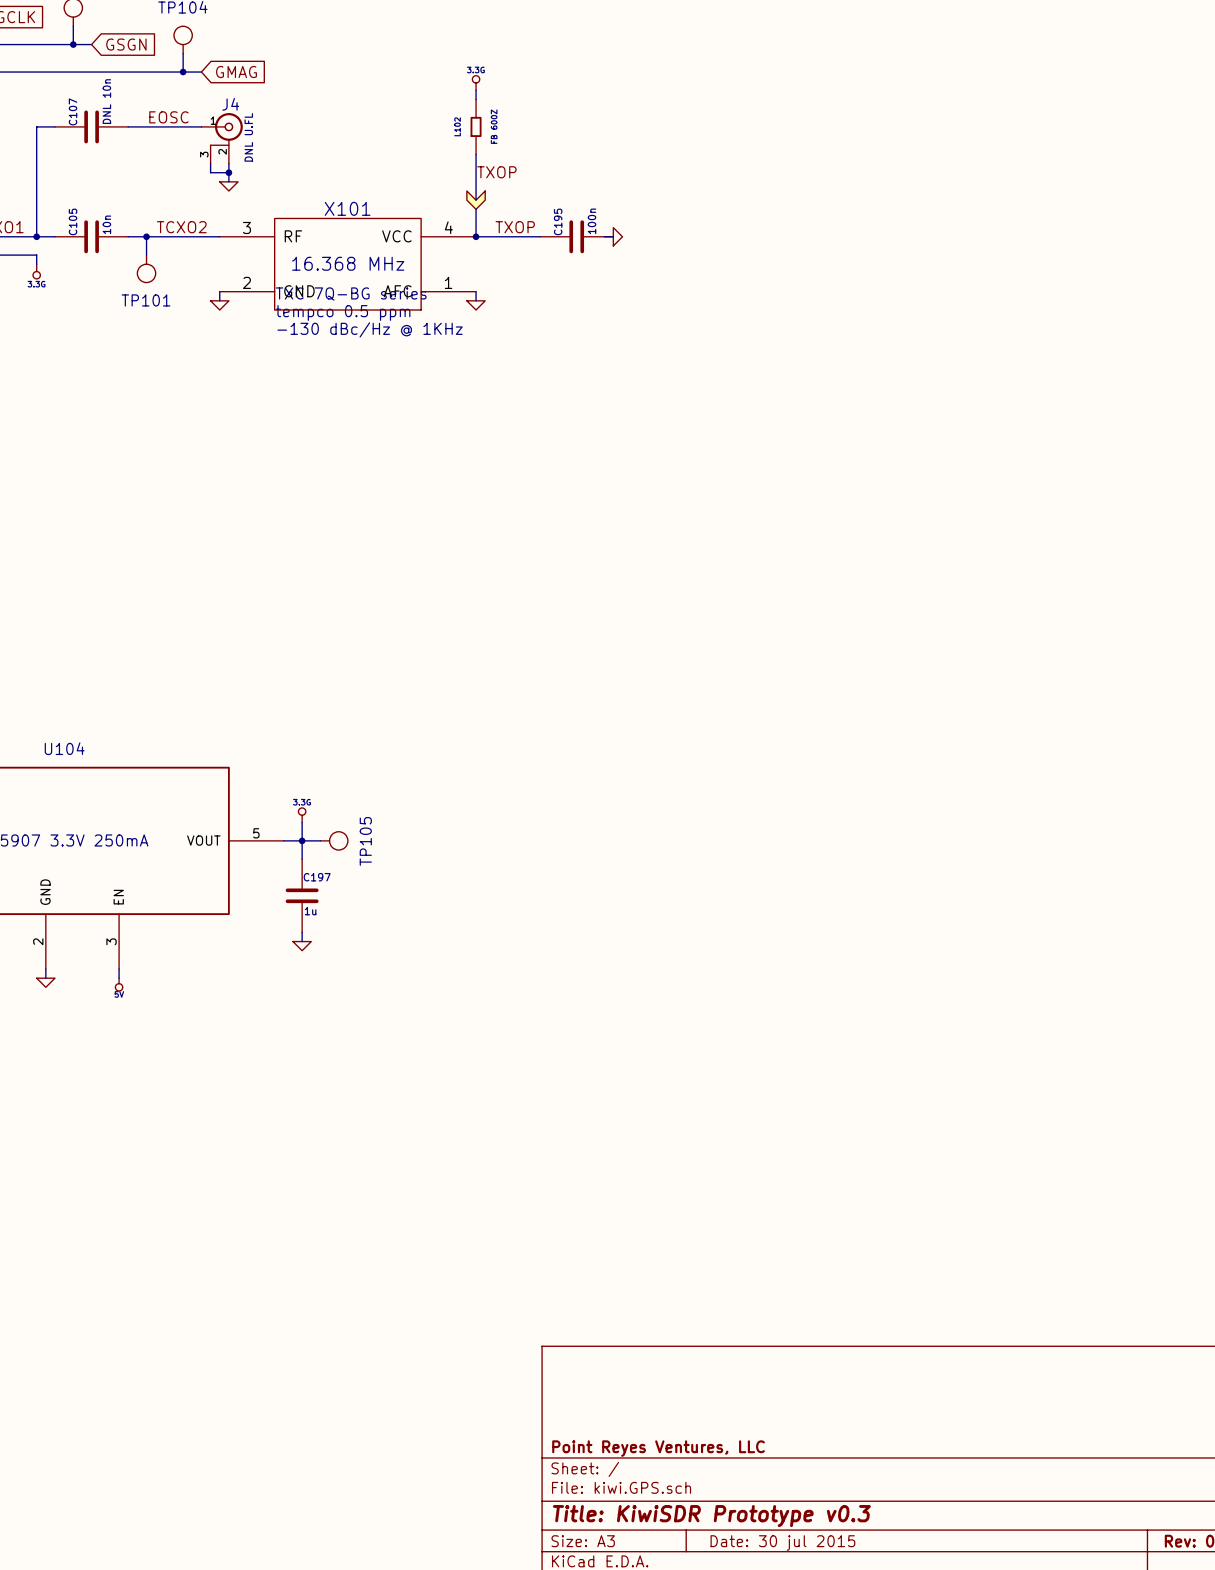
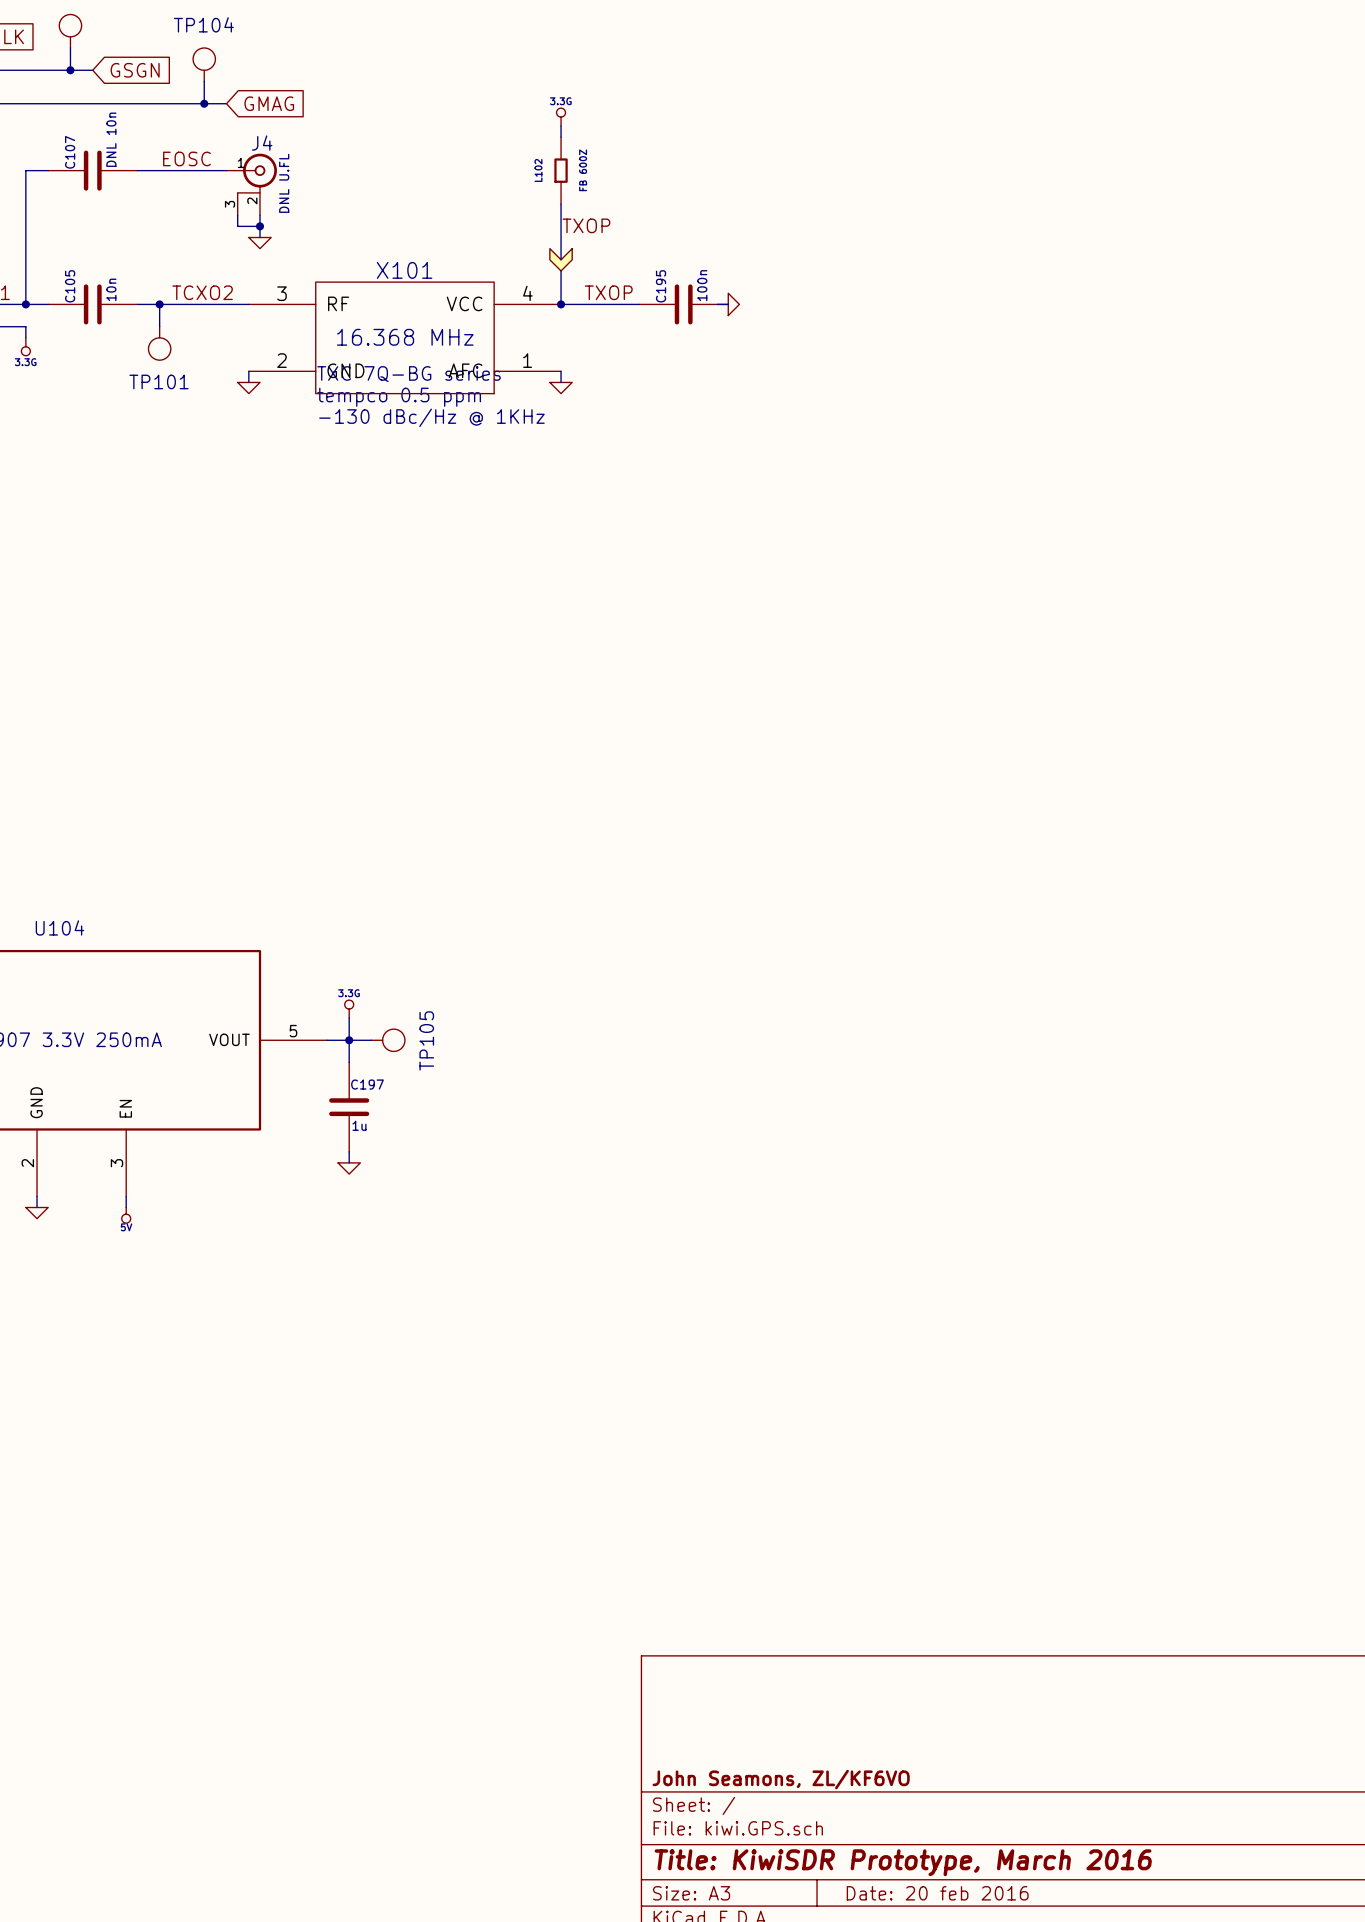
title block: Point Reyes Ventures, LLC (658, 1448) -> John Seamons, ZL/KF6VO (781, 1779)
title block: Title: KiwiSDR Prototype v0.3 (711, 1516) -> Title: KiwiSDR Prototype, March 2016 (903, 1862)
title block: Date: 30 jul 2015 (782, 1542) -> Date: 20 feb 2016 (937, 1893)

